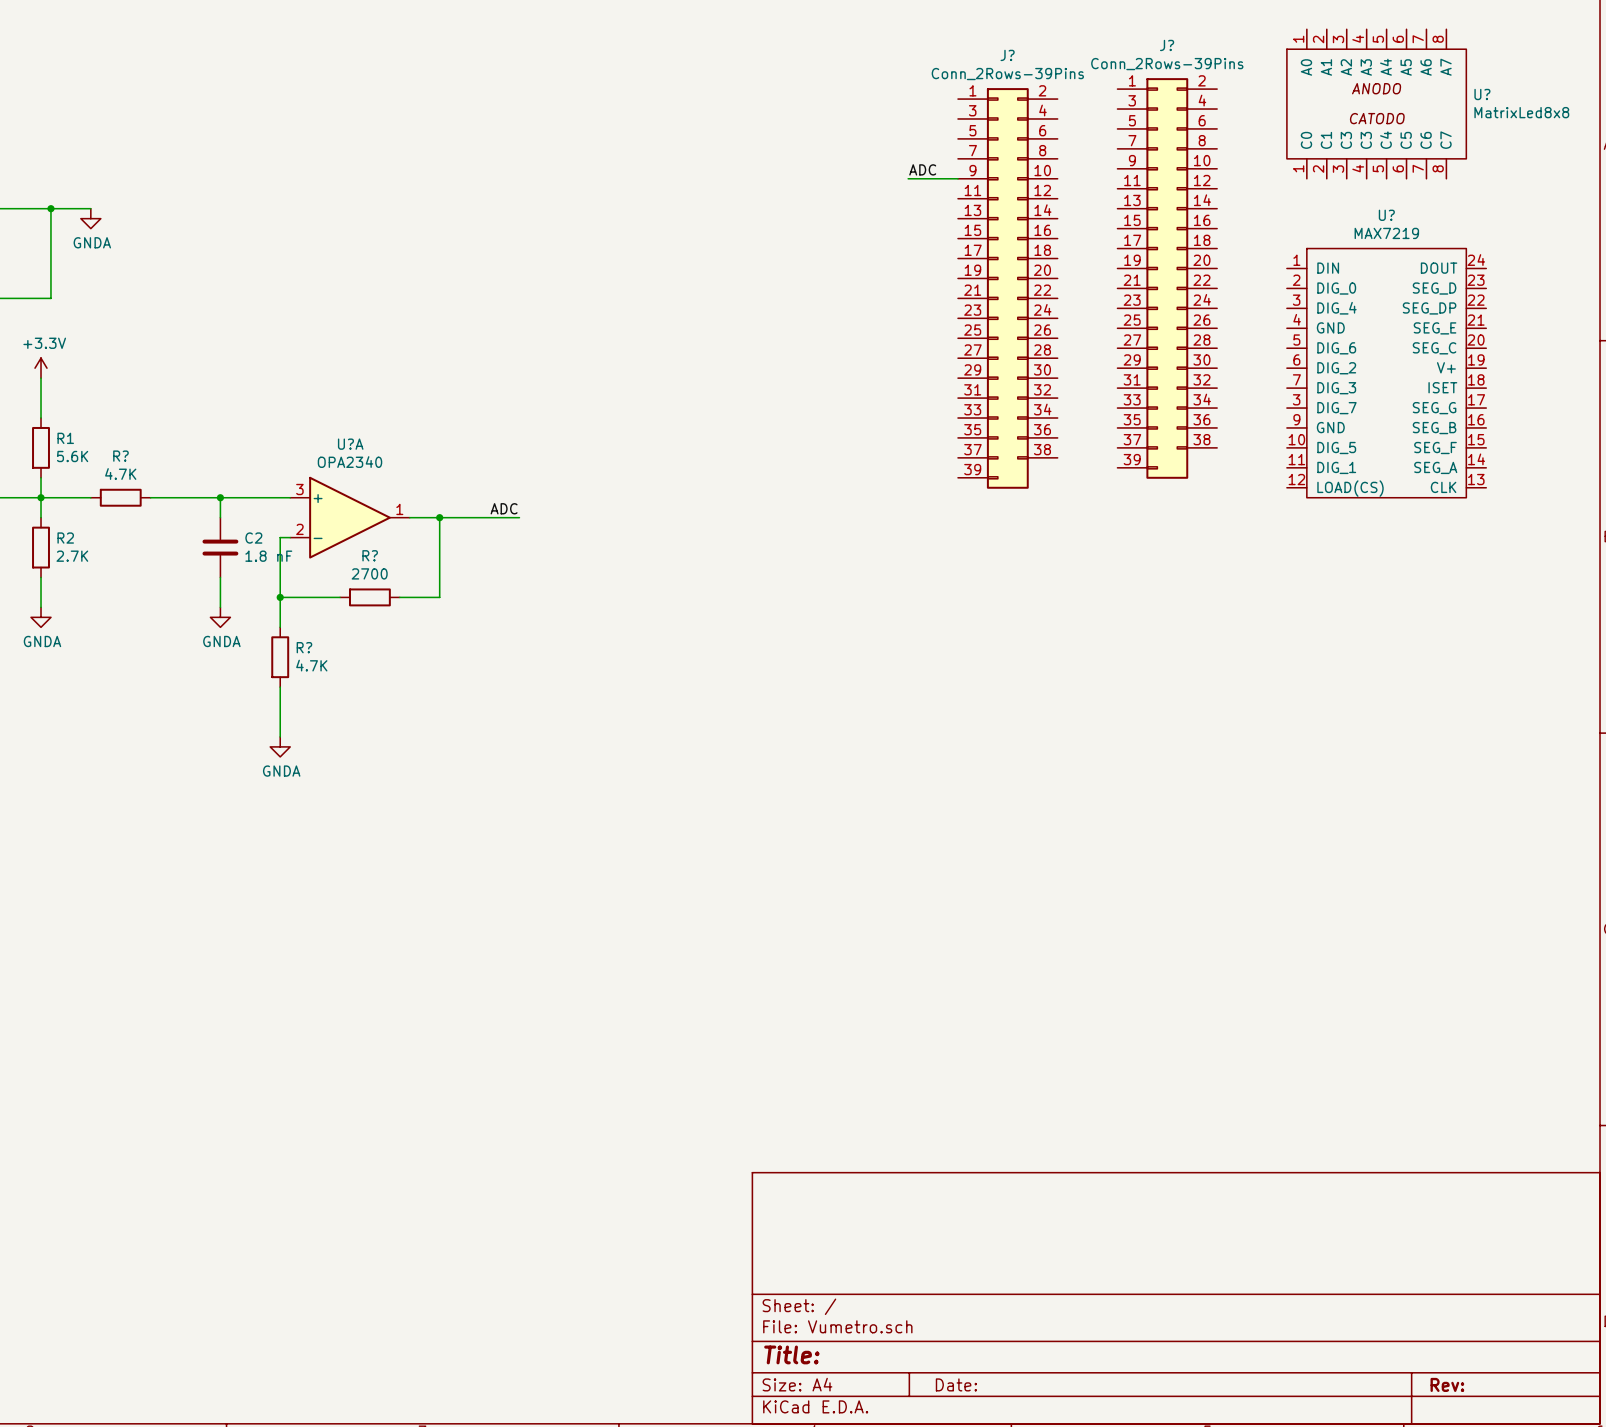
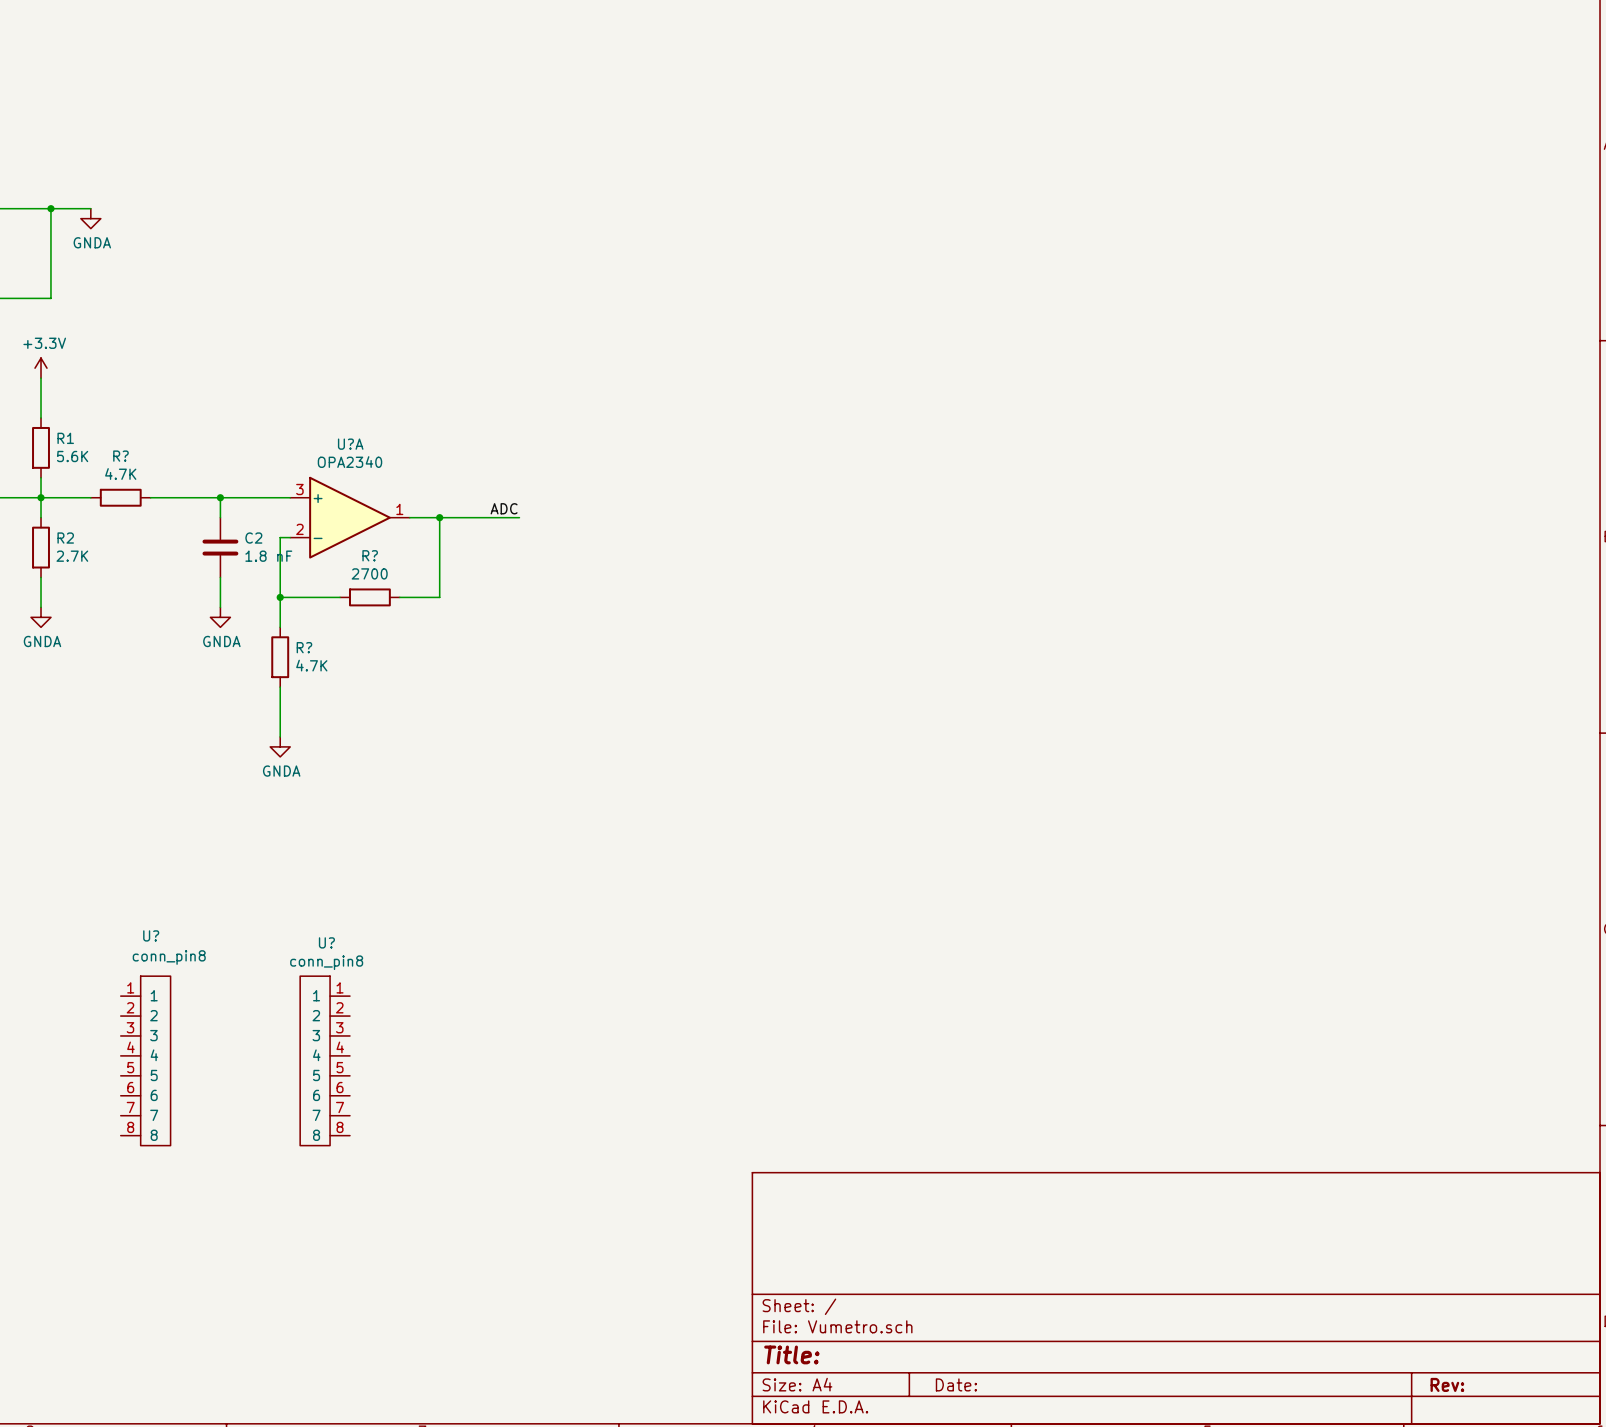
U?: MatrixLed8x8 (1376, 104) -> none
label: ADC (922, 169) -> none
wire: (908, 178) (957, 178) -> none
J?: Conn_2Rows-39Pins (1167, 278) -> none
J?: Conn_2Rows-39Pins (1007, 288) -> none
U?: MAX7219 (1386, 373) -> none
U?: none -> conn_pin8 (145, 1060)
U?: none -> conn_pin8 (325, 1060)

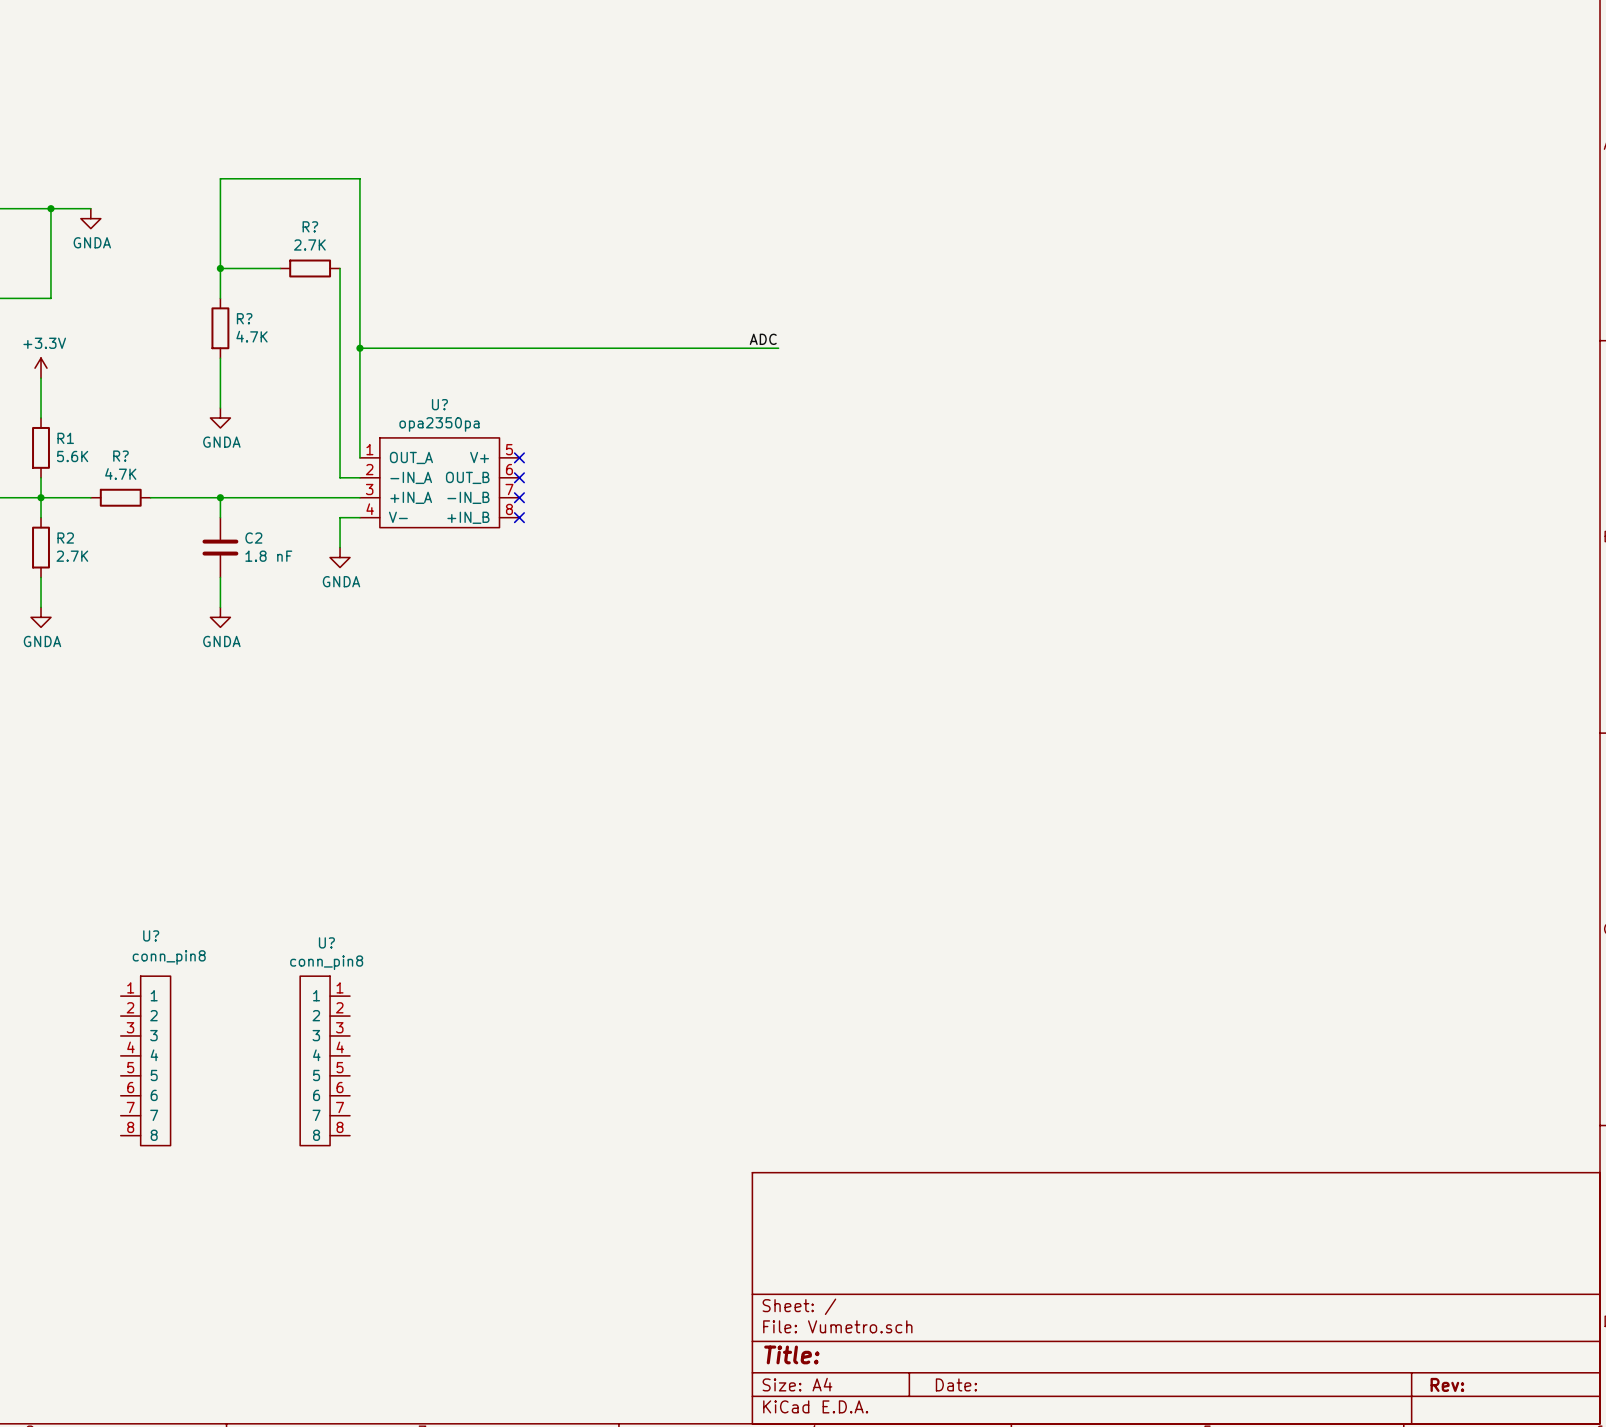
wire: none -> (220, 268) (280, 268)
junction: none -> (220, 268)
R?: none -> 2.7K (310, 268)
wire: none -> (340, 268) (340, 477) (359, 477)
wire: none -> (220, 298) (220, 178) (359, 178) (359, 457)
R?: none -> 4.7K (220, 328)
label: none -> ADC (763, 339)
wire: none -> (359, 348) (778, 348)
junction: none -> (359, 348)
wire: none -> (220, 358) (220, 408)
power symbol: none -> GNDA (220, 418)
no-connect mark: none -> (519, 457)
no-connect mark: none -> (519, 477)
U?: none -> opa2350pa (439, 482)
no-connect mark: none -> (519, 497)
label: ADC (504, 508) -> none
U?A: OPA2340 (349, 517) -> none
wire: (409, 517) (519, 517) -> none
wire: (439, 517) (439, 597) (399, 597) -> none
junction: (439, 517) -> none
no-connect mark: none -> (519, 517)
wire: (290, 537) (280, 537) (280, 627) -> none
power symbol: none -> GNDA (340, 557)
wire: (280, 597) (340, 597) -> none
junction: (280, 597) -> none
R?: 2700 (369, 597) -> none
R?: 4.7K (280, 657) -> none
wire: (280, 687) (280, 736) -> none
power symbol: GNDA (280, 746) -> none

